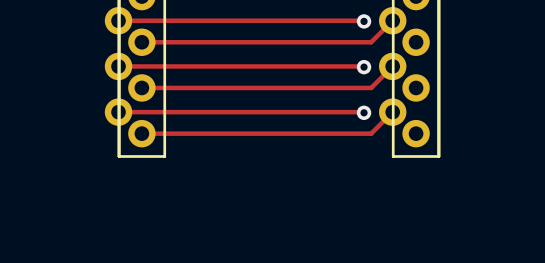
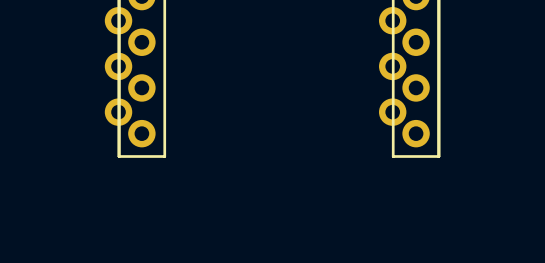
track: (118, 20) (364, 21) -> none
track: (392, 20) (371, 42) (141, 42) -> none
via: (364, 21) -> none
track: (118, 66) (364, 67) -> none
track: (392, 66) (371, 87) (141, 87) -> none
via: (364, 67) -> none
track: (118, 112) (364, 112) -> none
via: (364, 112) -> none
track: (392, 112) (371, 133) (141, 133) -> none

